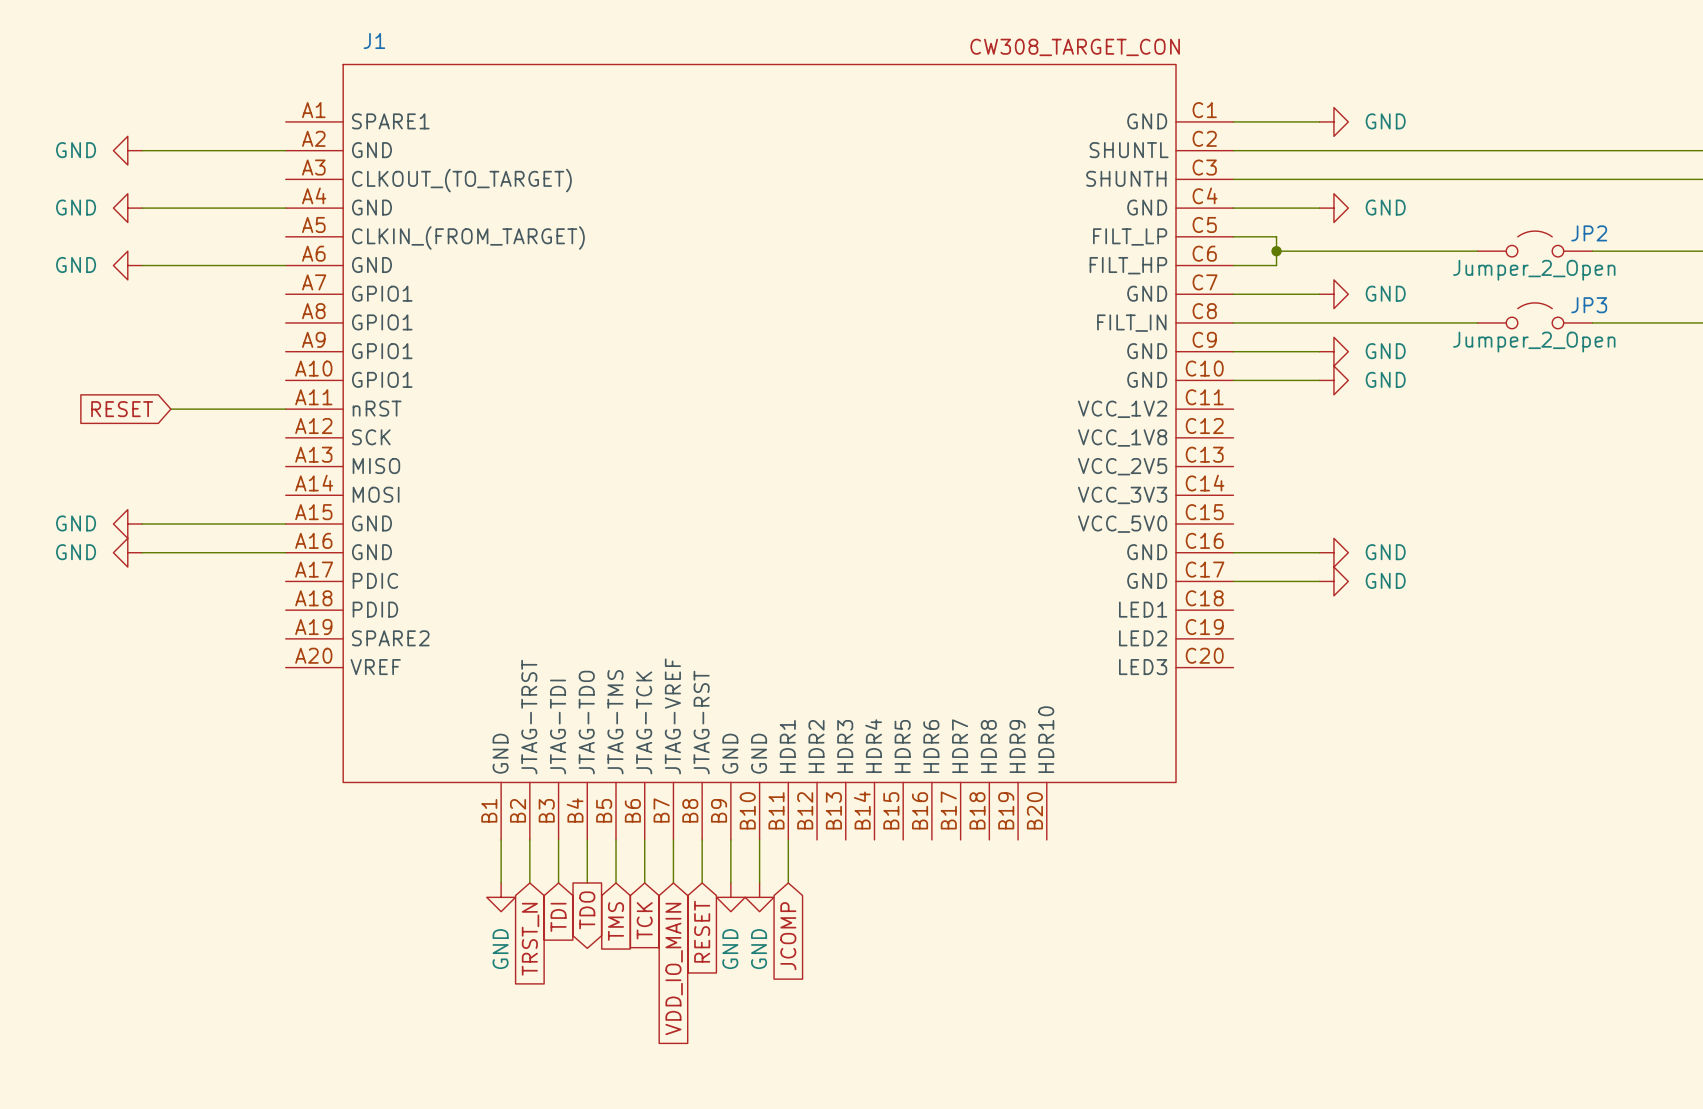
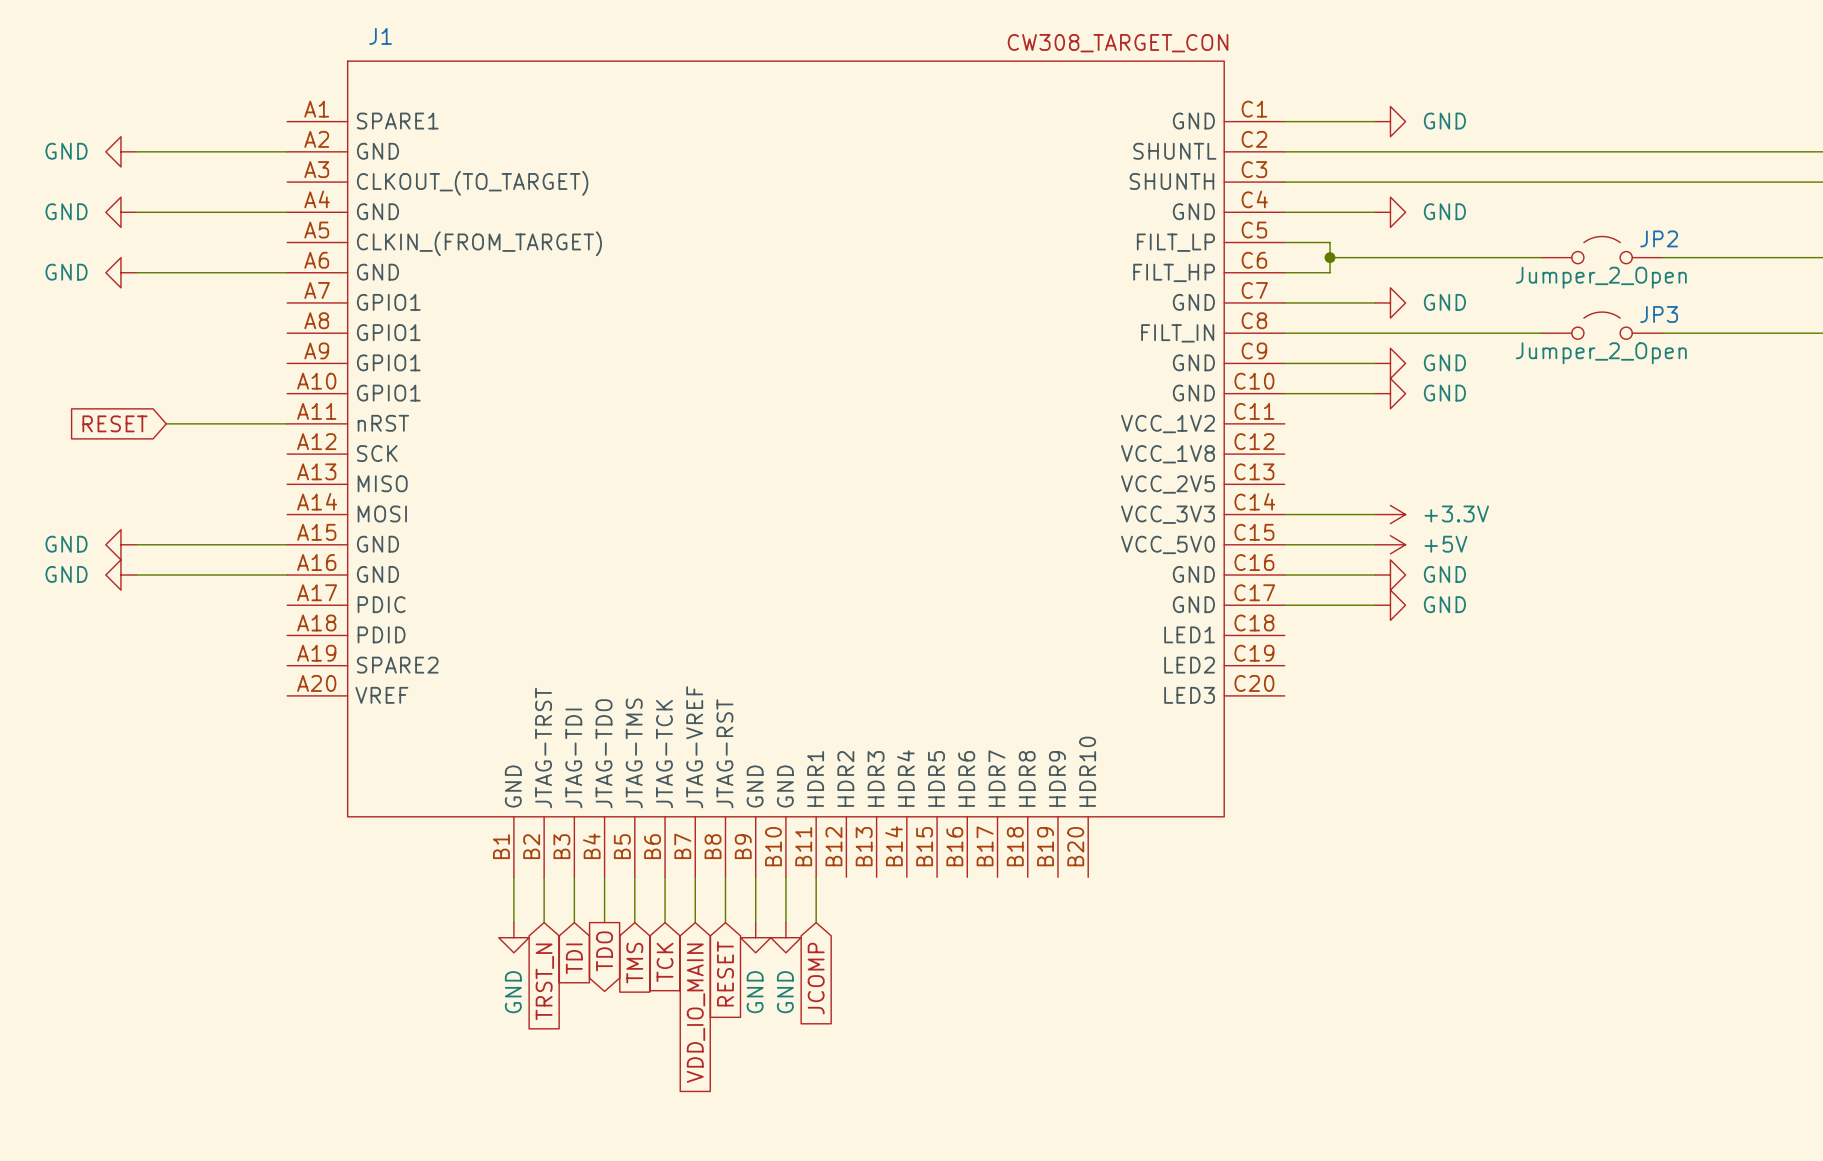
wire: none -> (1284, 514) (1375, 514)
power symbol: none -> +3.3V (1390, 514)
wire: none -> (1284, 544) (1375, 544)
power symbol: none -> +5V (1390, 544)

